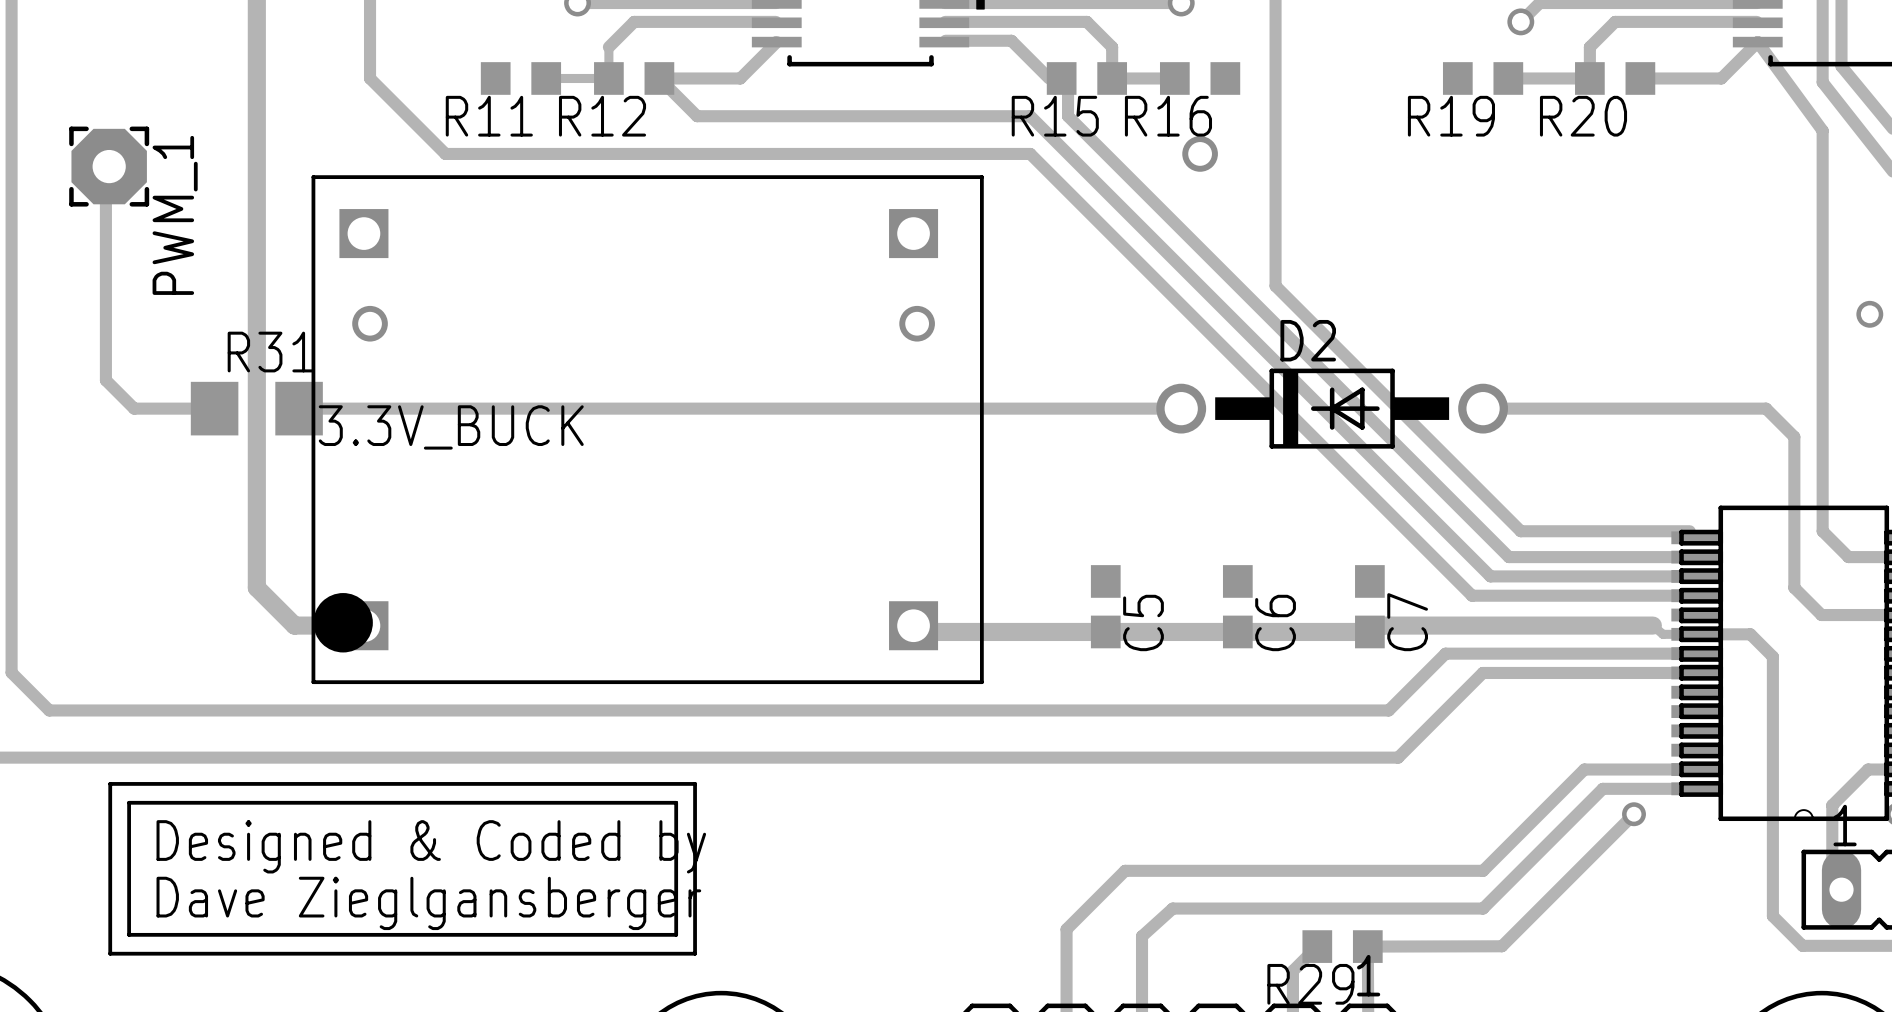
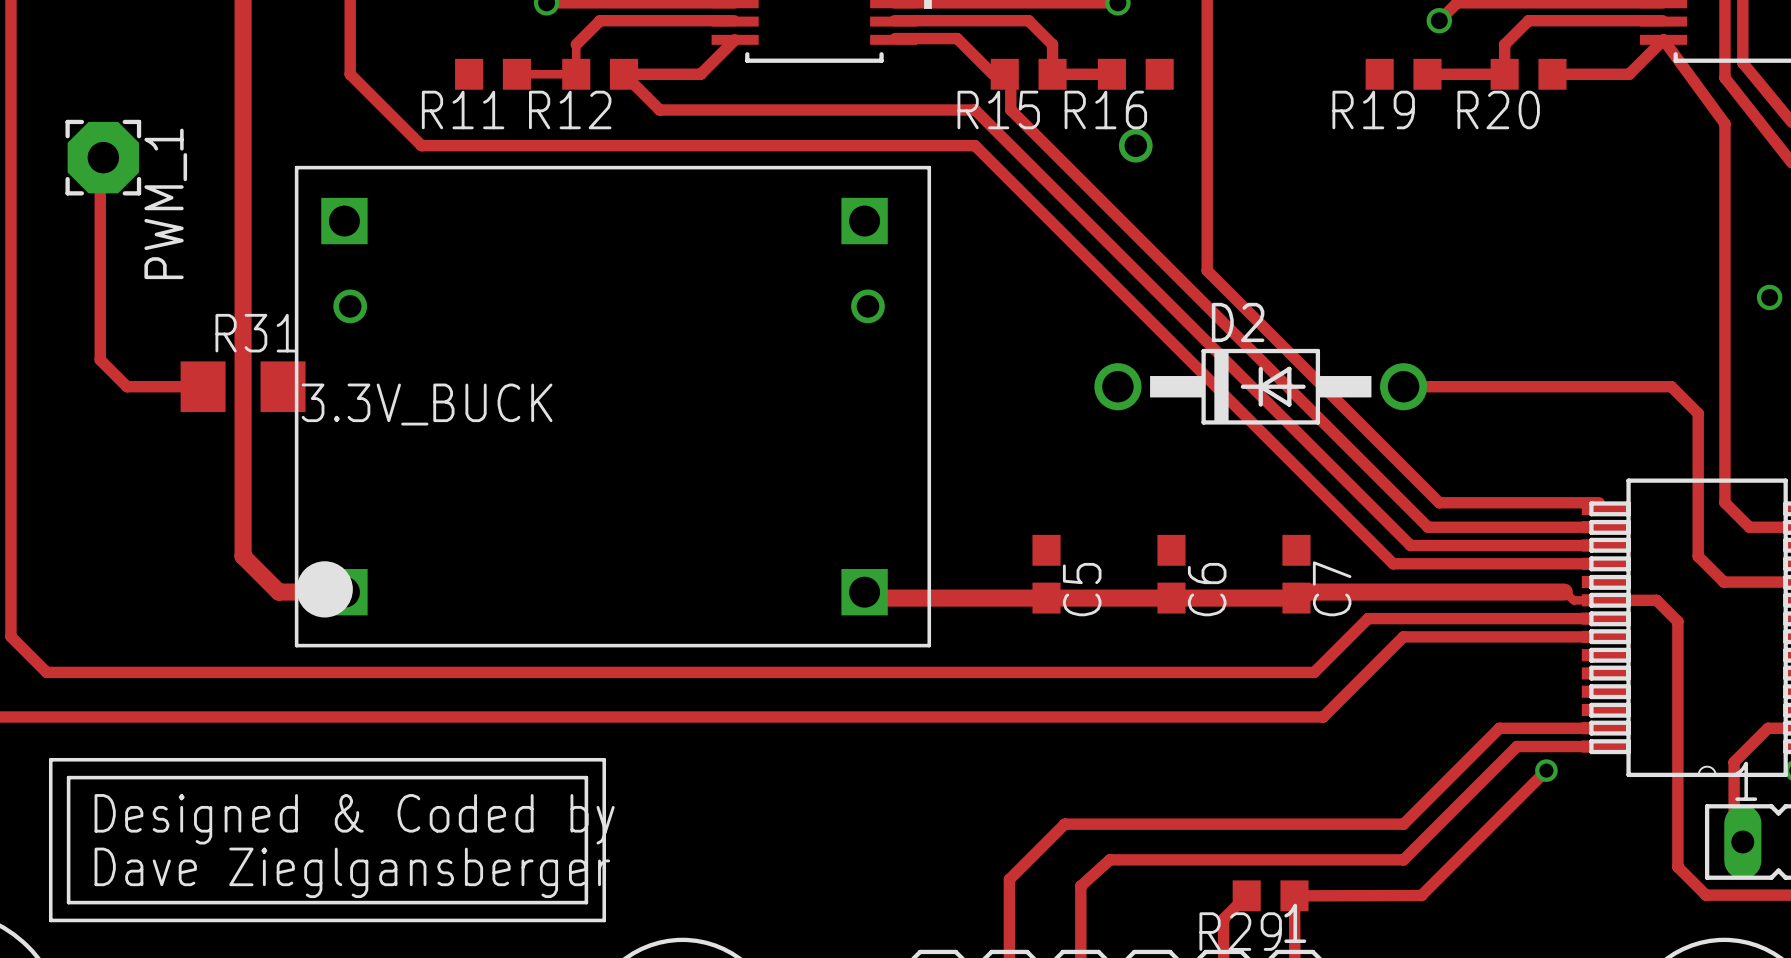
track: (299, 408) (1181, 408) -> none
drawing position: (402, 868) -> (327, 840)

